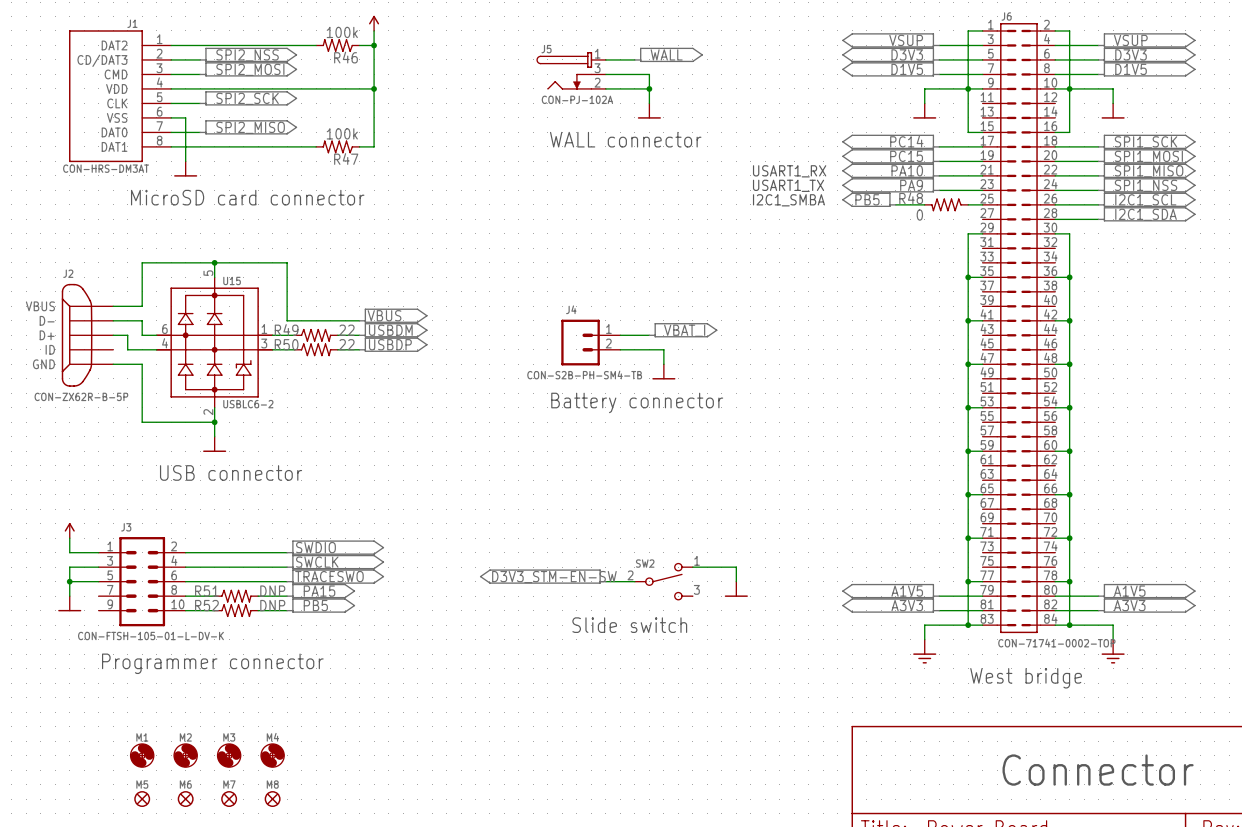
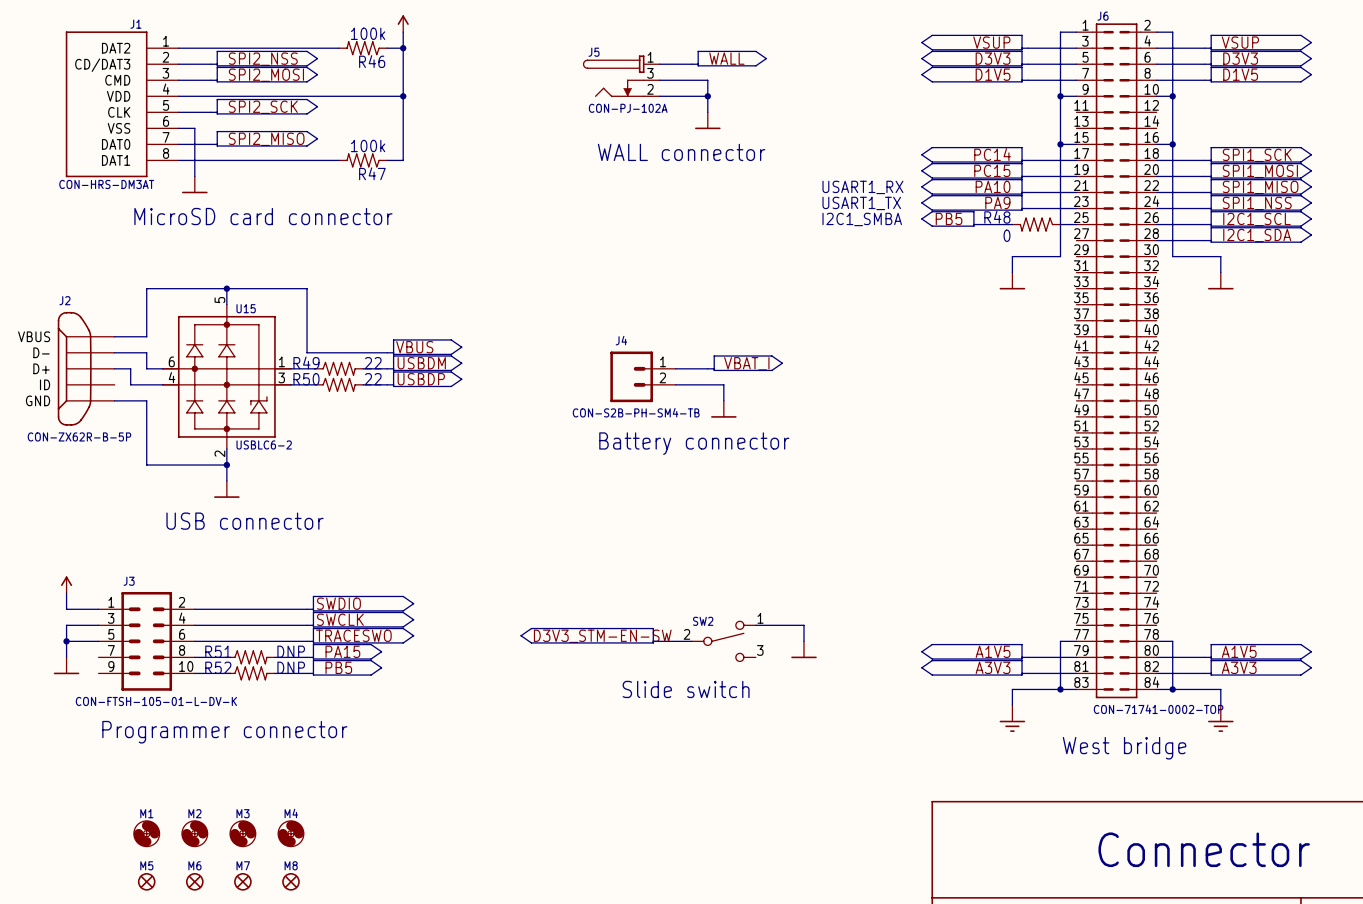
wire: (968, 88) (924, 88) (924, 103) -> none
wire: (1069, 88) (1113, 88) (1113, 103) -> none
power symbol: (924, 111) -> none
power symbol: (1113, 111) -> none
wire: none -> (1060, 144) (1060, 256) (1012, 256) (1012, 272)
junction: none -> (1060, 144)
wire: none -> (1172, 144) (1172, 256) (1220, 256) (1220, 272)
junction: none -> (1172, 144)
wire: (982, 233) (968, 233) (968, 581) -> none
wire: (1055, 233) (1069, 233) (1069, 581) -> none
power symbol: none -> (1012, 281)
power symbol: none -> (1220, 281)
wire: (968, 277) (982, 277) -> none
junction: (968, 277) -> none
wire: (1055, 277) (1069, 277) -> none
junction: (1069, 277) -> none
wire: (968, 320) (982, 320) -> none
junction: (968, 320) -> none
wire: (1055, 320) (1069, 320) -> none
junction: (1069, 320) -> none
wire: (968, 364) (982, 364) -> none
junction: (968, 364) -> none
wire: (1055, 364) (1069, 364) -> none
junction: (1069, 364) -> none
wire: (968, 407) (982, 407) -> none
junction: (968, 407) -> none
wire: (1055, 407) (1069, 407) -> none
junction: (1069, 407) -> none
wire: (968, 451) (982, 451) -> none
junction: (968, 451) -> none
wire: (1055, 451) (1069, 451) -> none
junction: (1069, 451) -> none
wire: (968, 494) (982, 494) -> none
junction: (968, 494) -> none
wire: (1055, 494) (1069, 494) -> none
junction: (1069, 494) -> none
wire: (968, 538) (982, 538) -> none
junction: (968, 538) -> none
wire: (1055, 538) (1069, 538) -> none
junction: (1069, 538) -> none
junction: (968, 581) -> none
junction: (1069, 581) -> none

